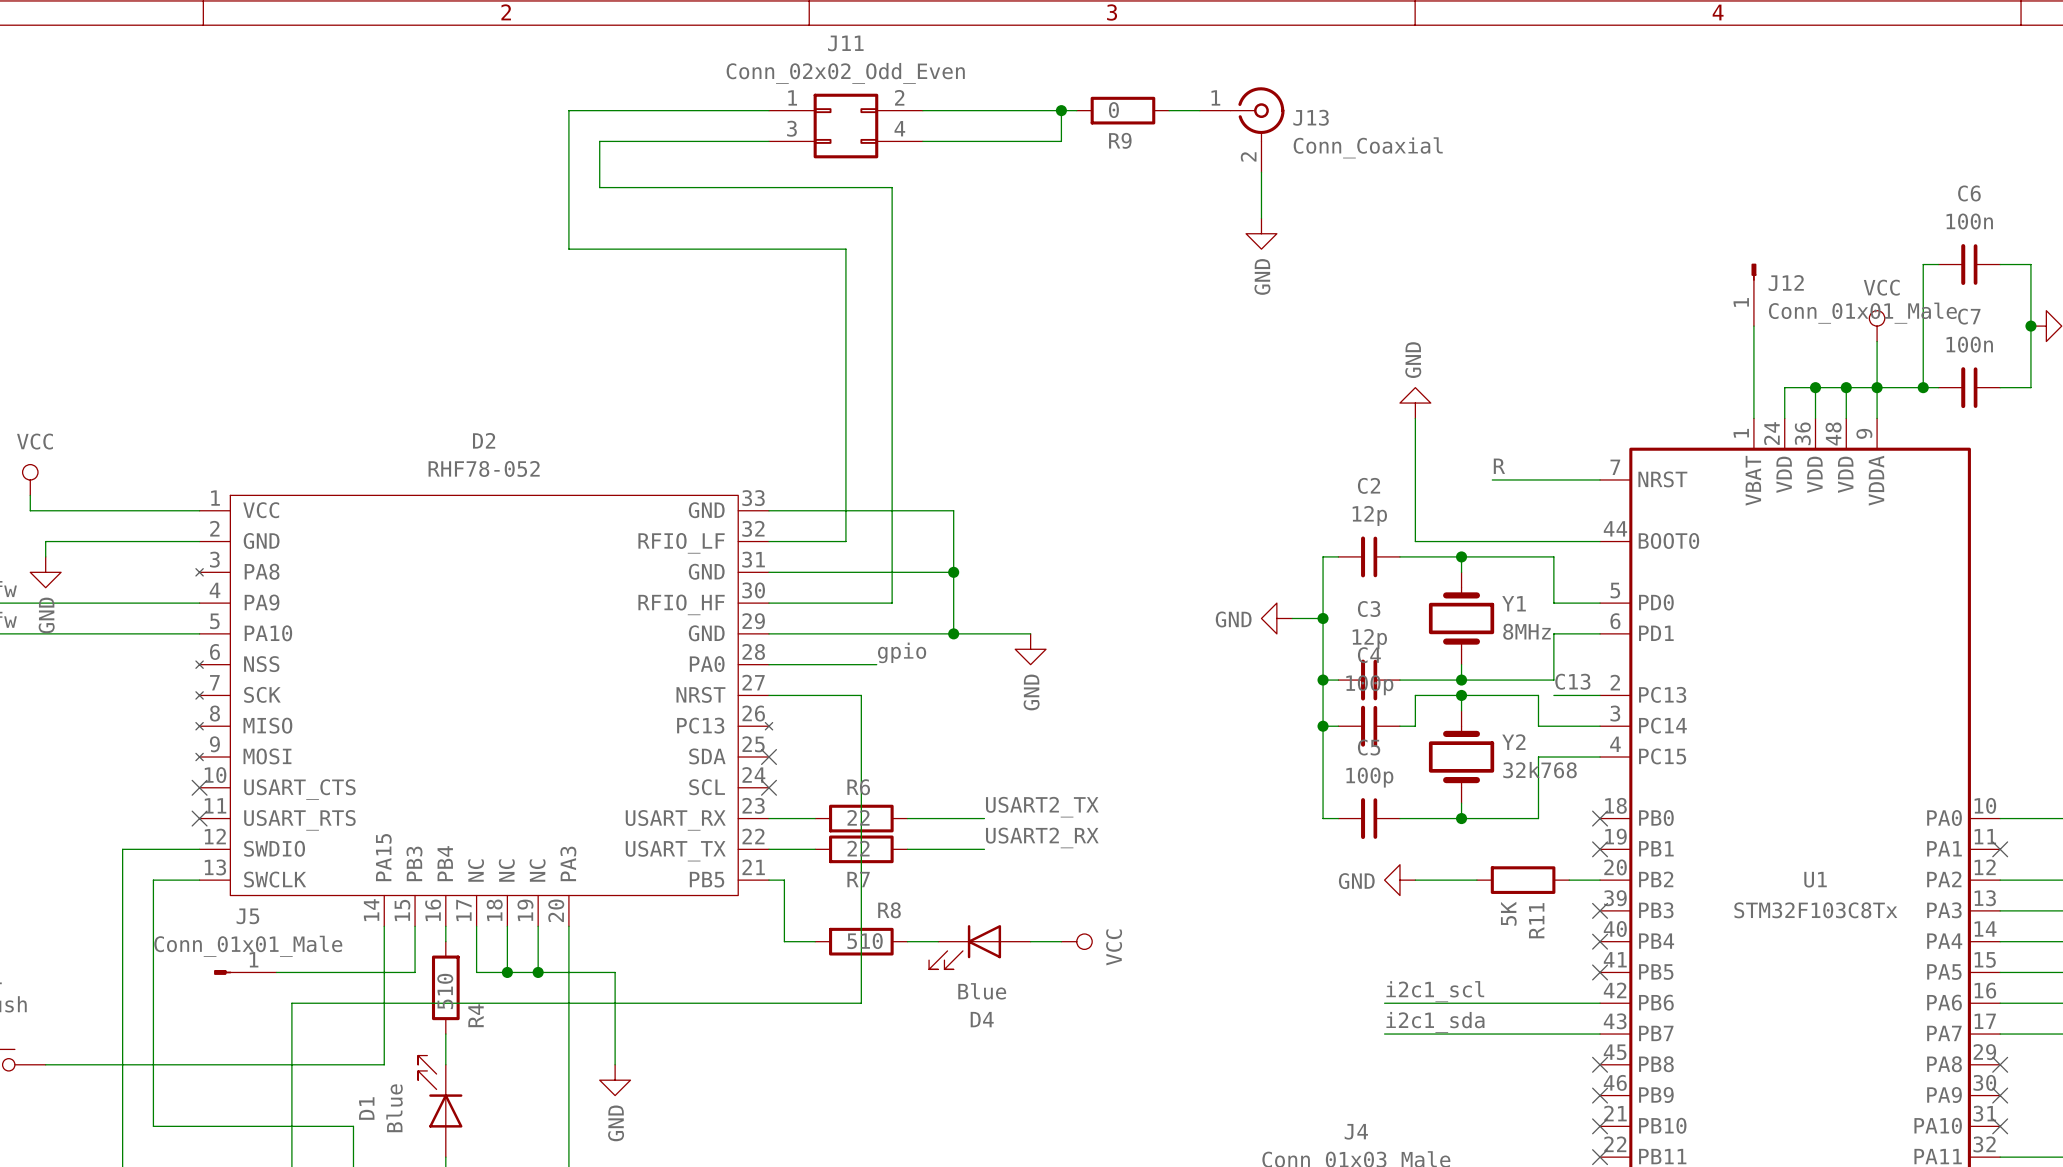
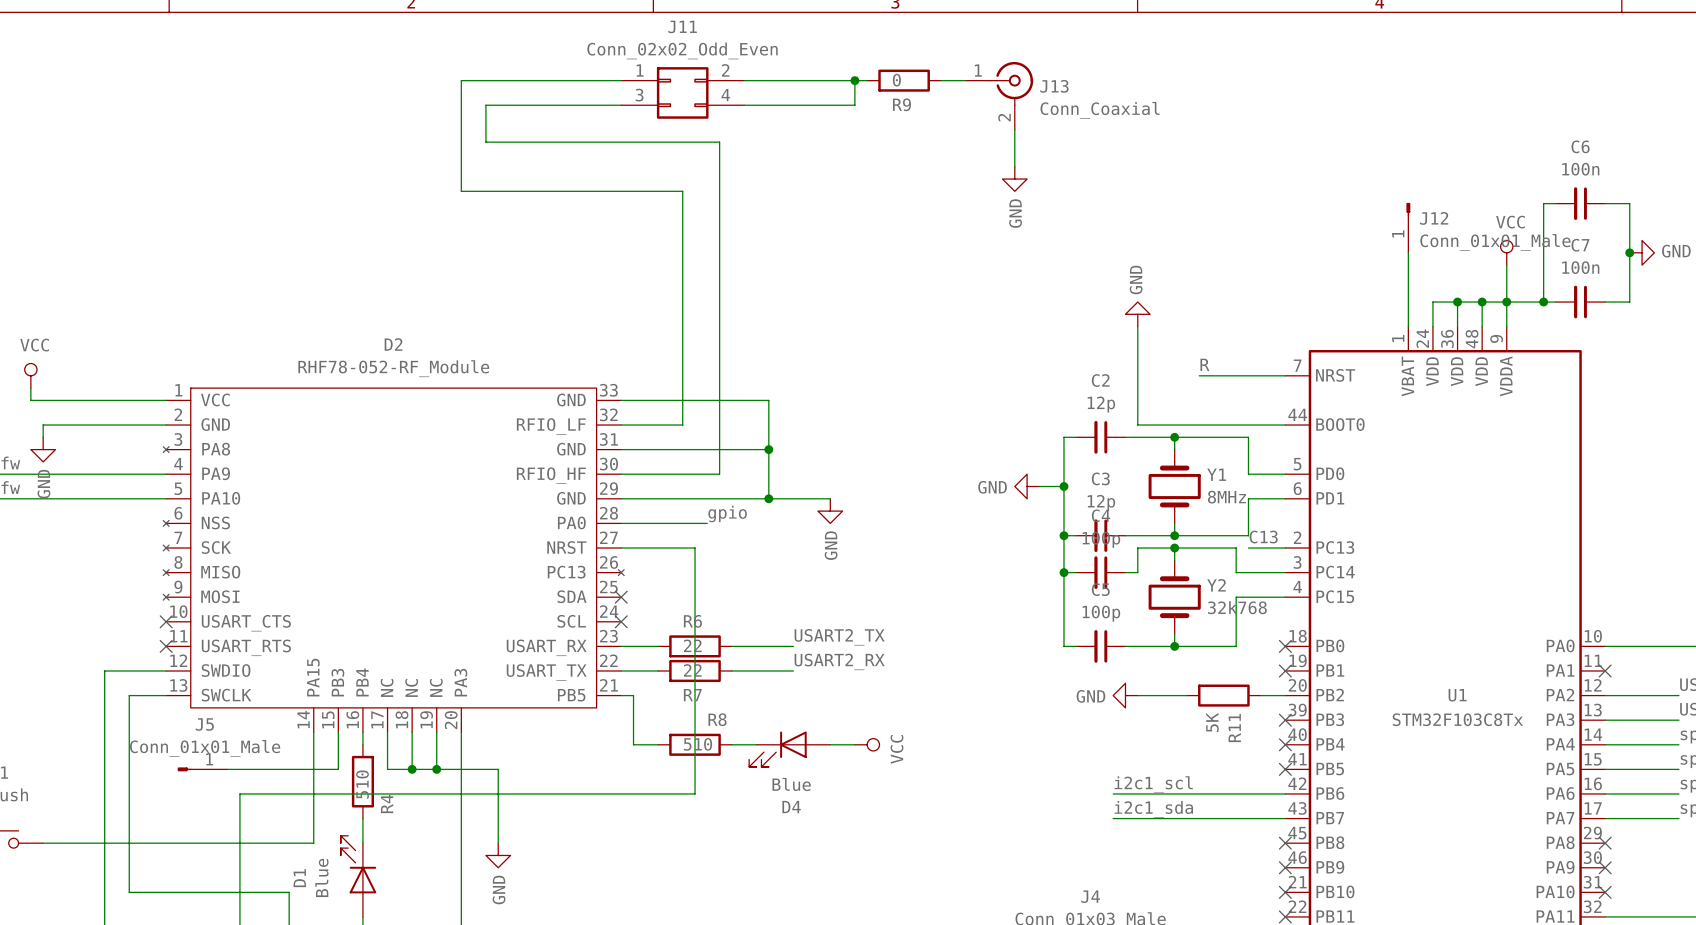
D2 value: RHF78-052 (484, 468) -> RHF78-052-RF_Module (393, 368)

